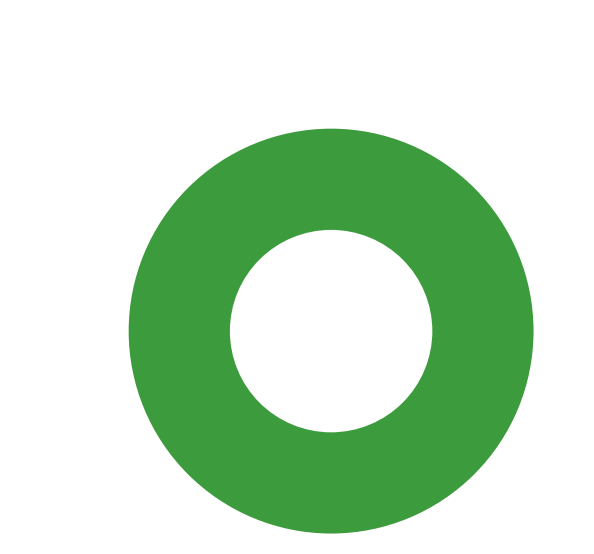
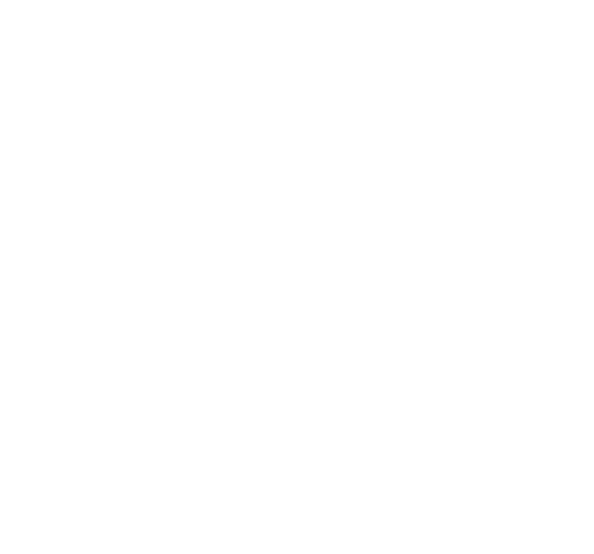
part: (331, 331) -> none

